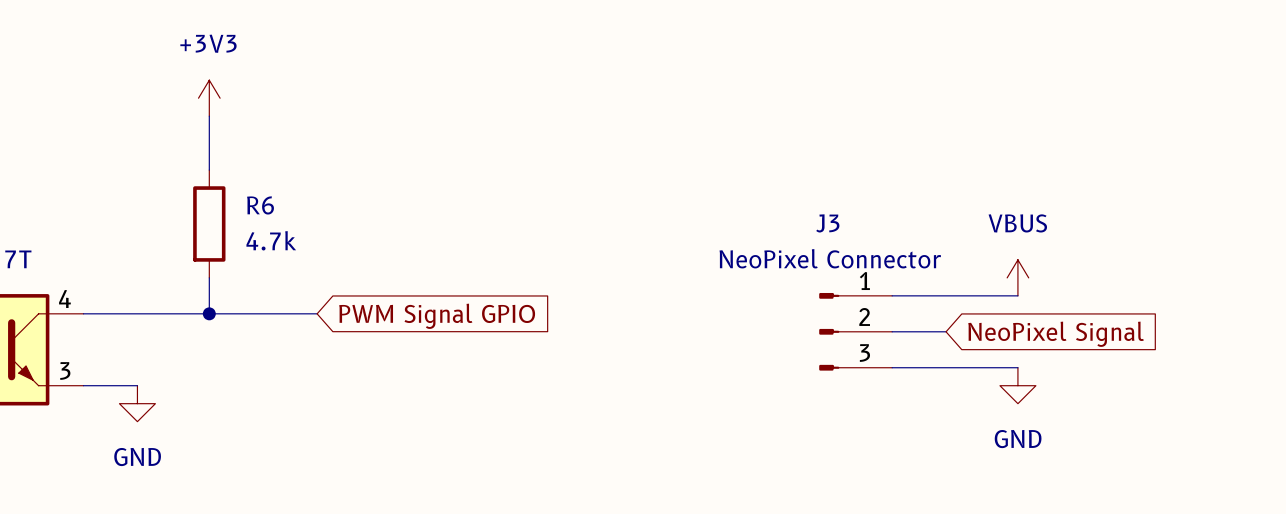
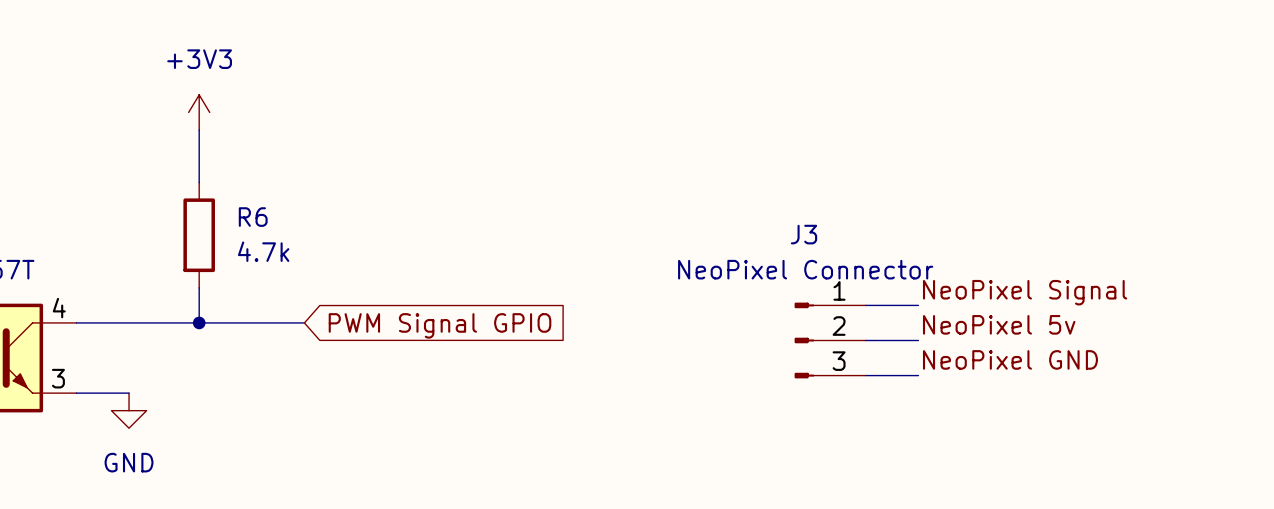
power symbol: VBUS (1017, 277) -> none
label: none -> NeoPixel Signal (1025, 292)
wire: (946, 295) (1017, 295) -> none
label: none -> NeoPixel 5v (999, 324)
global label: NeoPixel Signal (1056, 334) -> none
label: none -> NeoPixel GND (1010, 359)
wire: (946, 367) (1017, 367) -> none
power symbol: GND (1017, 385) -> none

